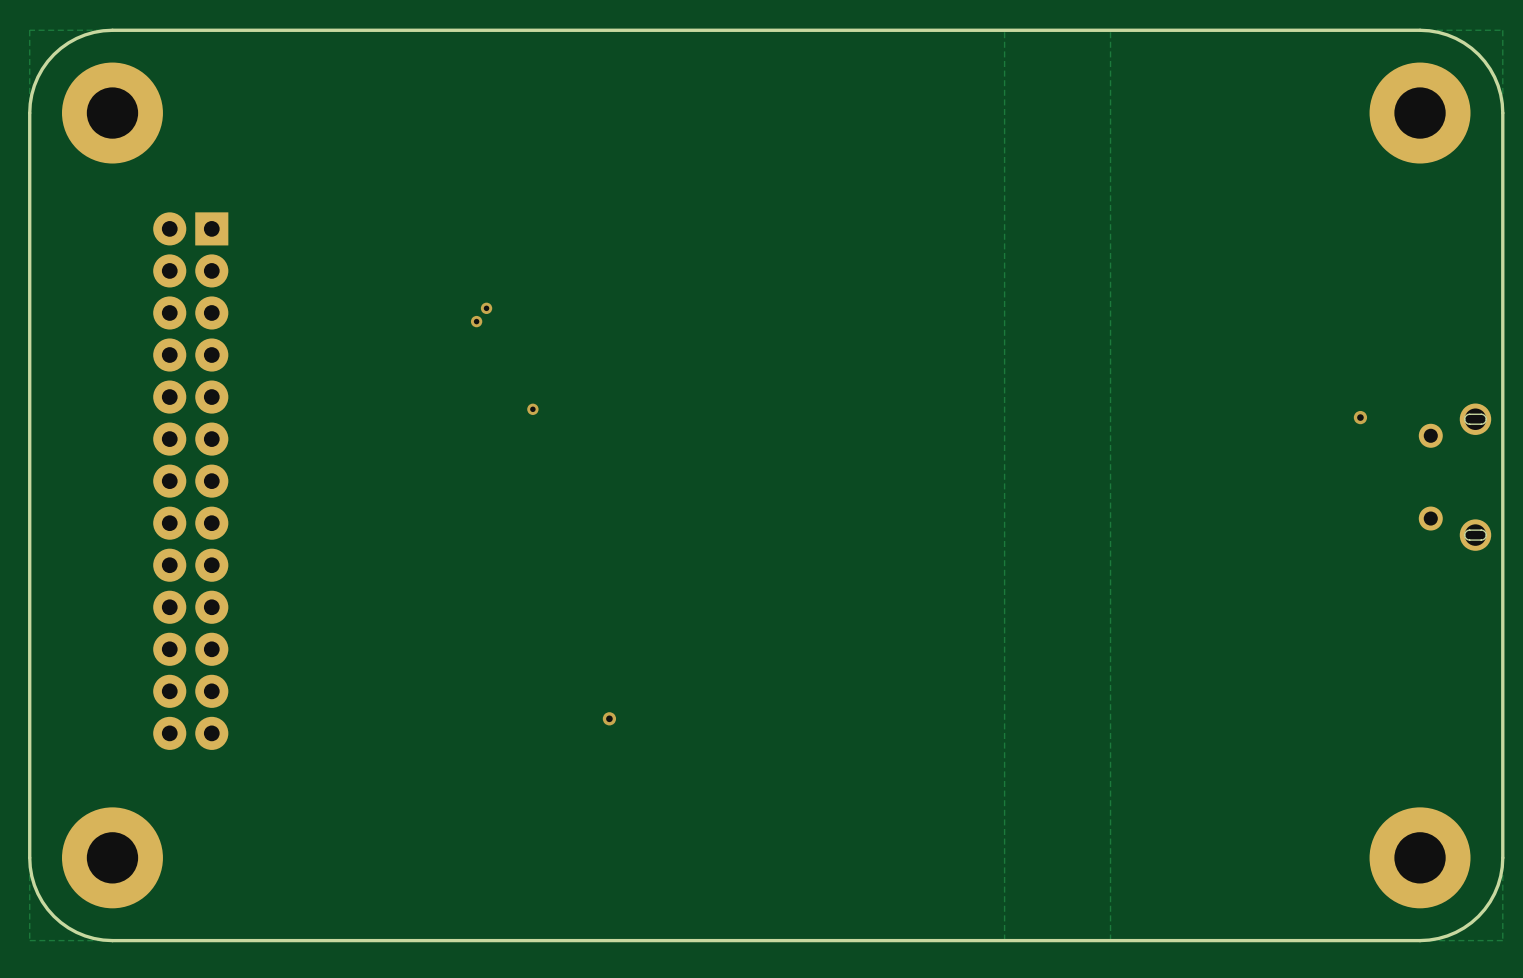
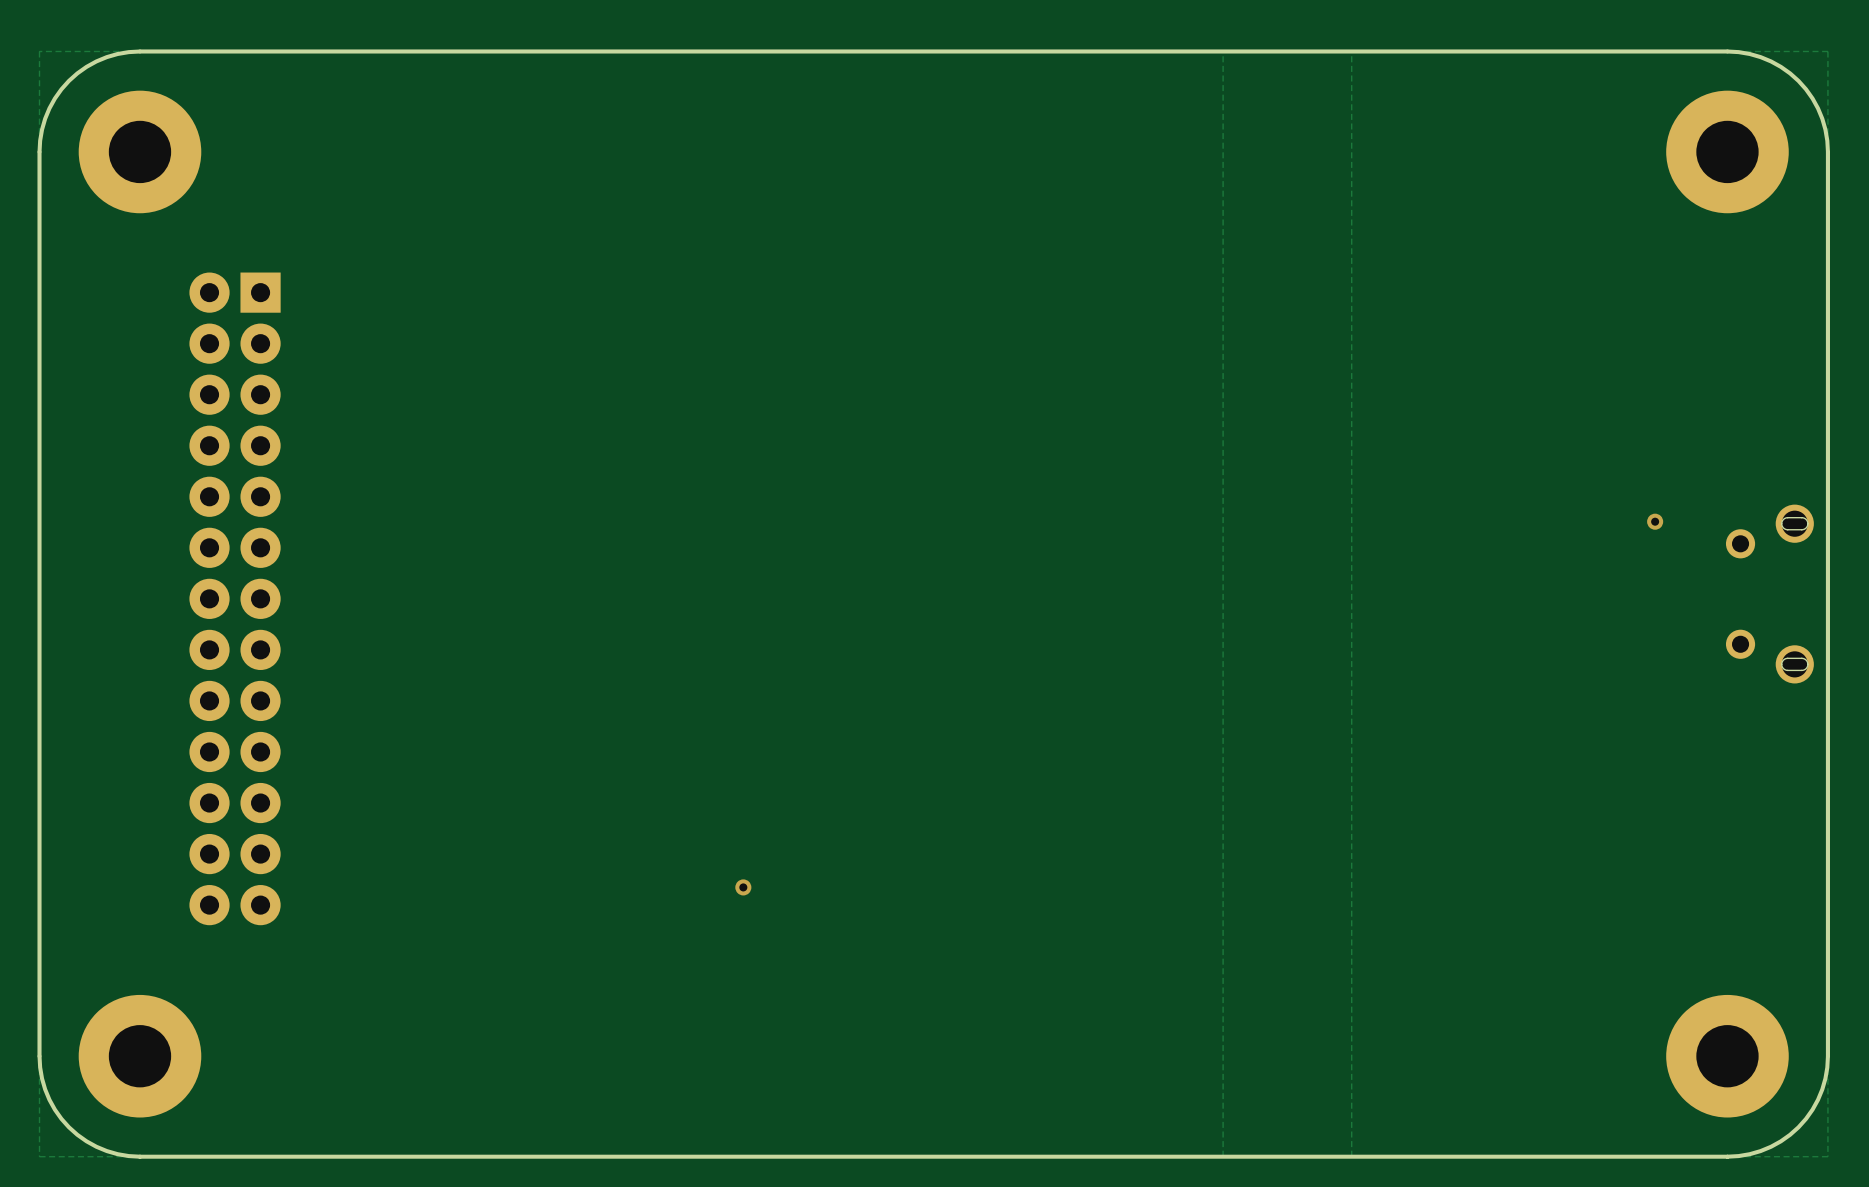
via: (486, 308) -> none
via: (476, 321) -> none
via: (532, 409) -> none

